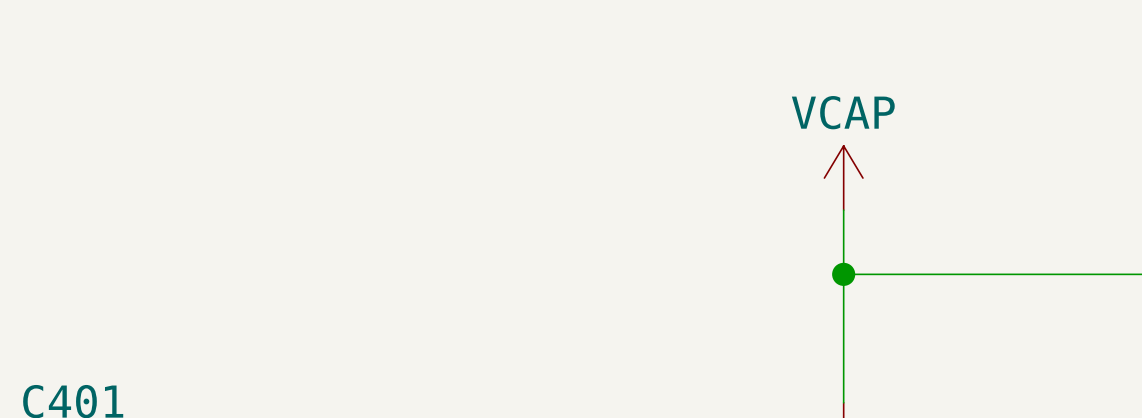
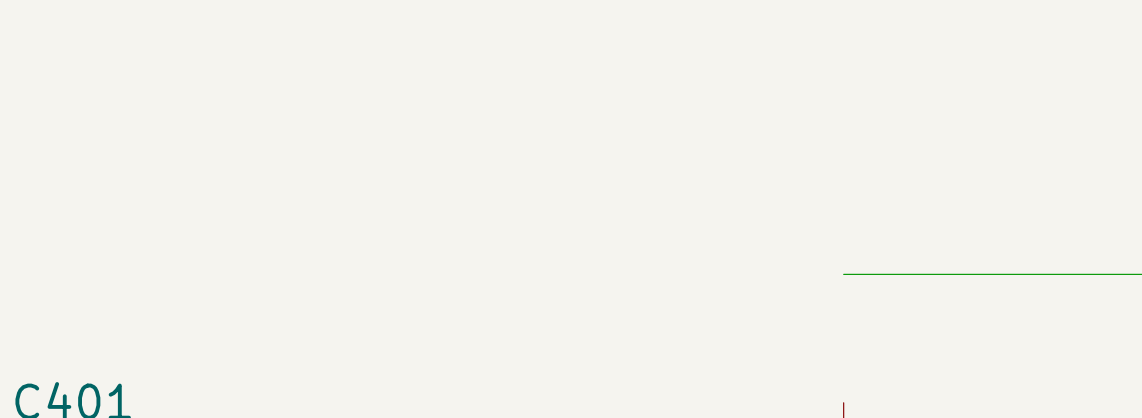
power symbol: VCAP (843, 178) -> none
wire: (843, 210) (843, 402) -> none
junction: (843, 274) -> none

